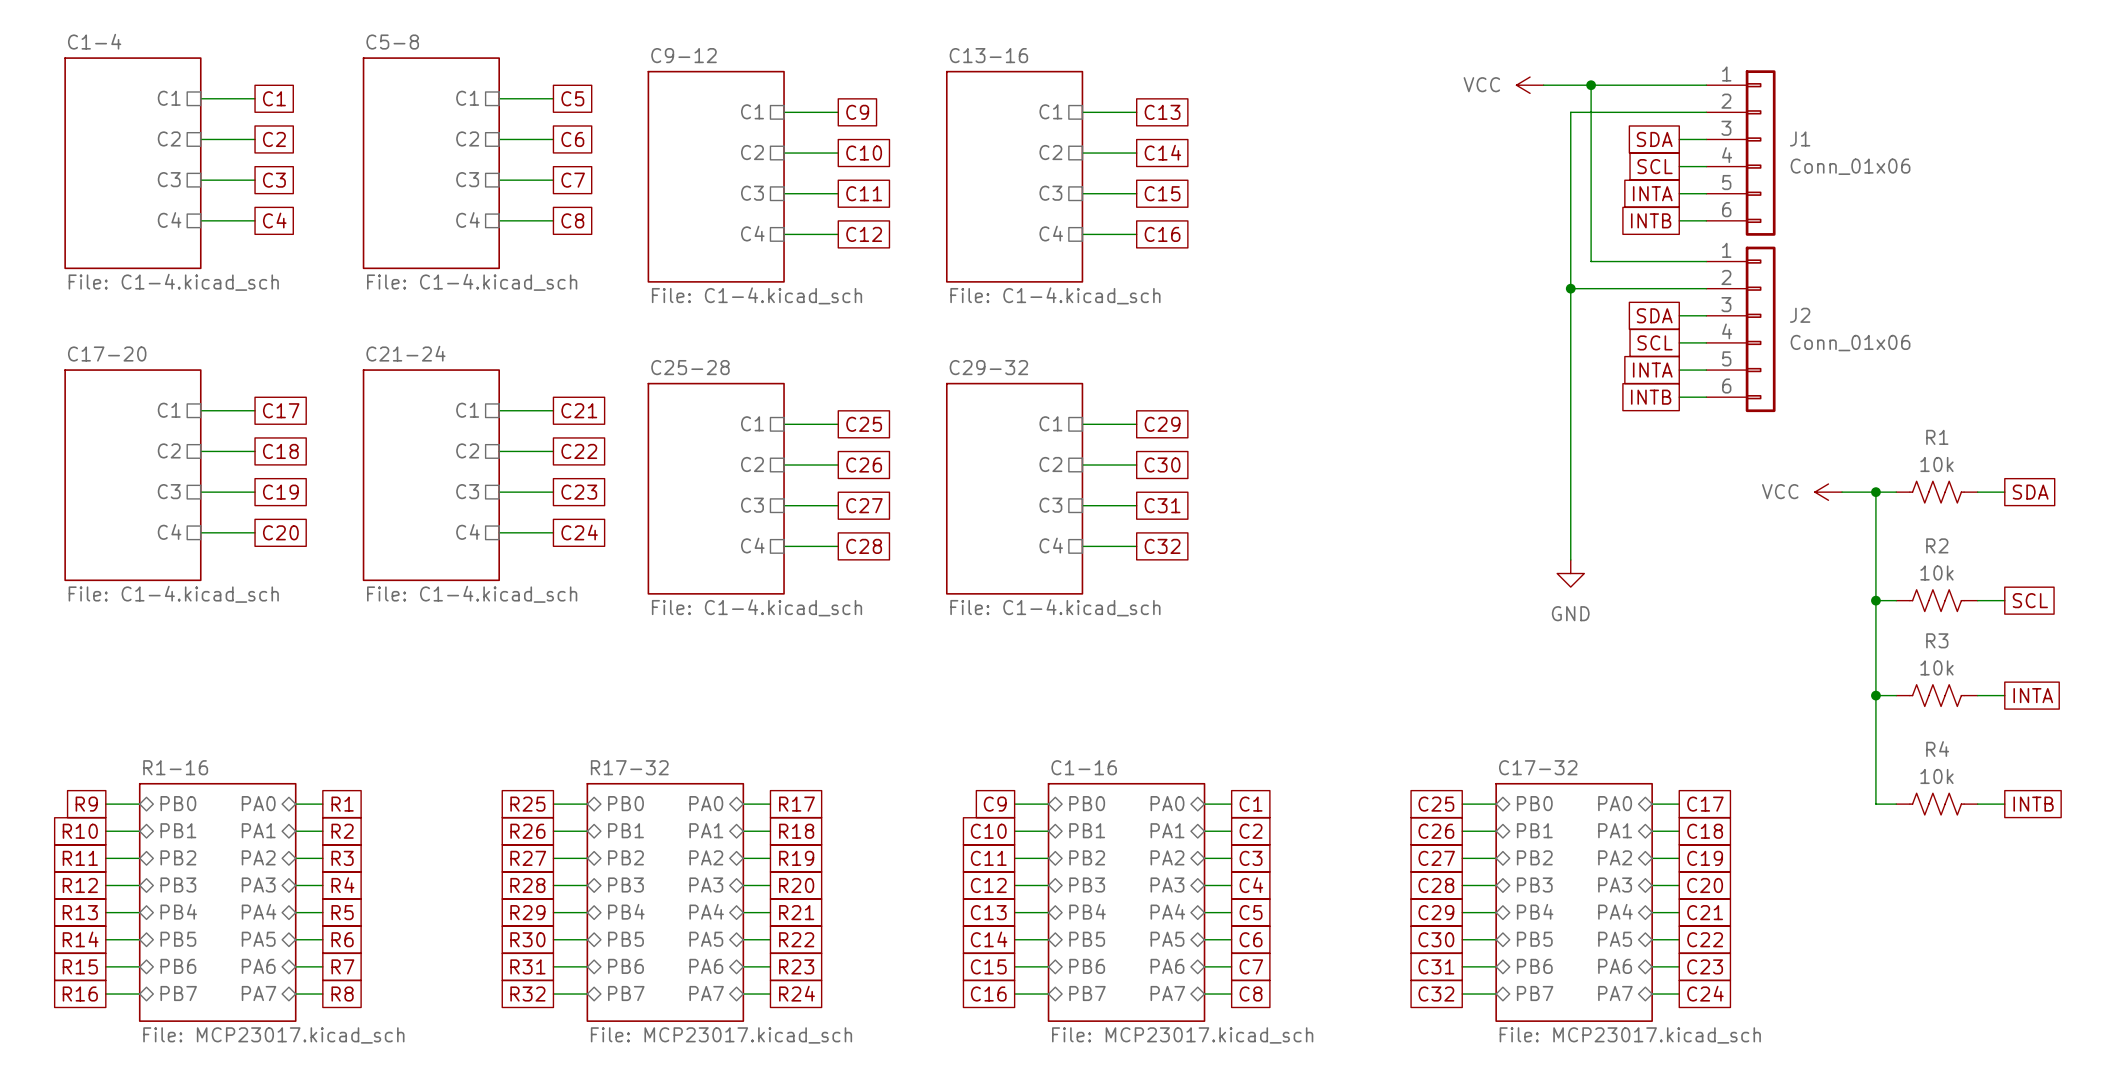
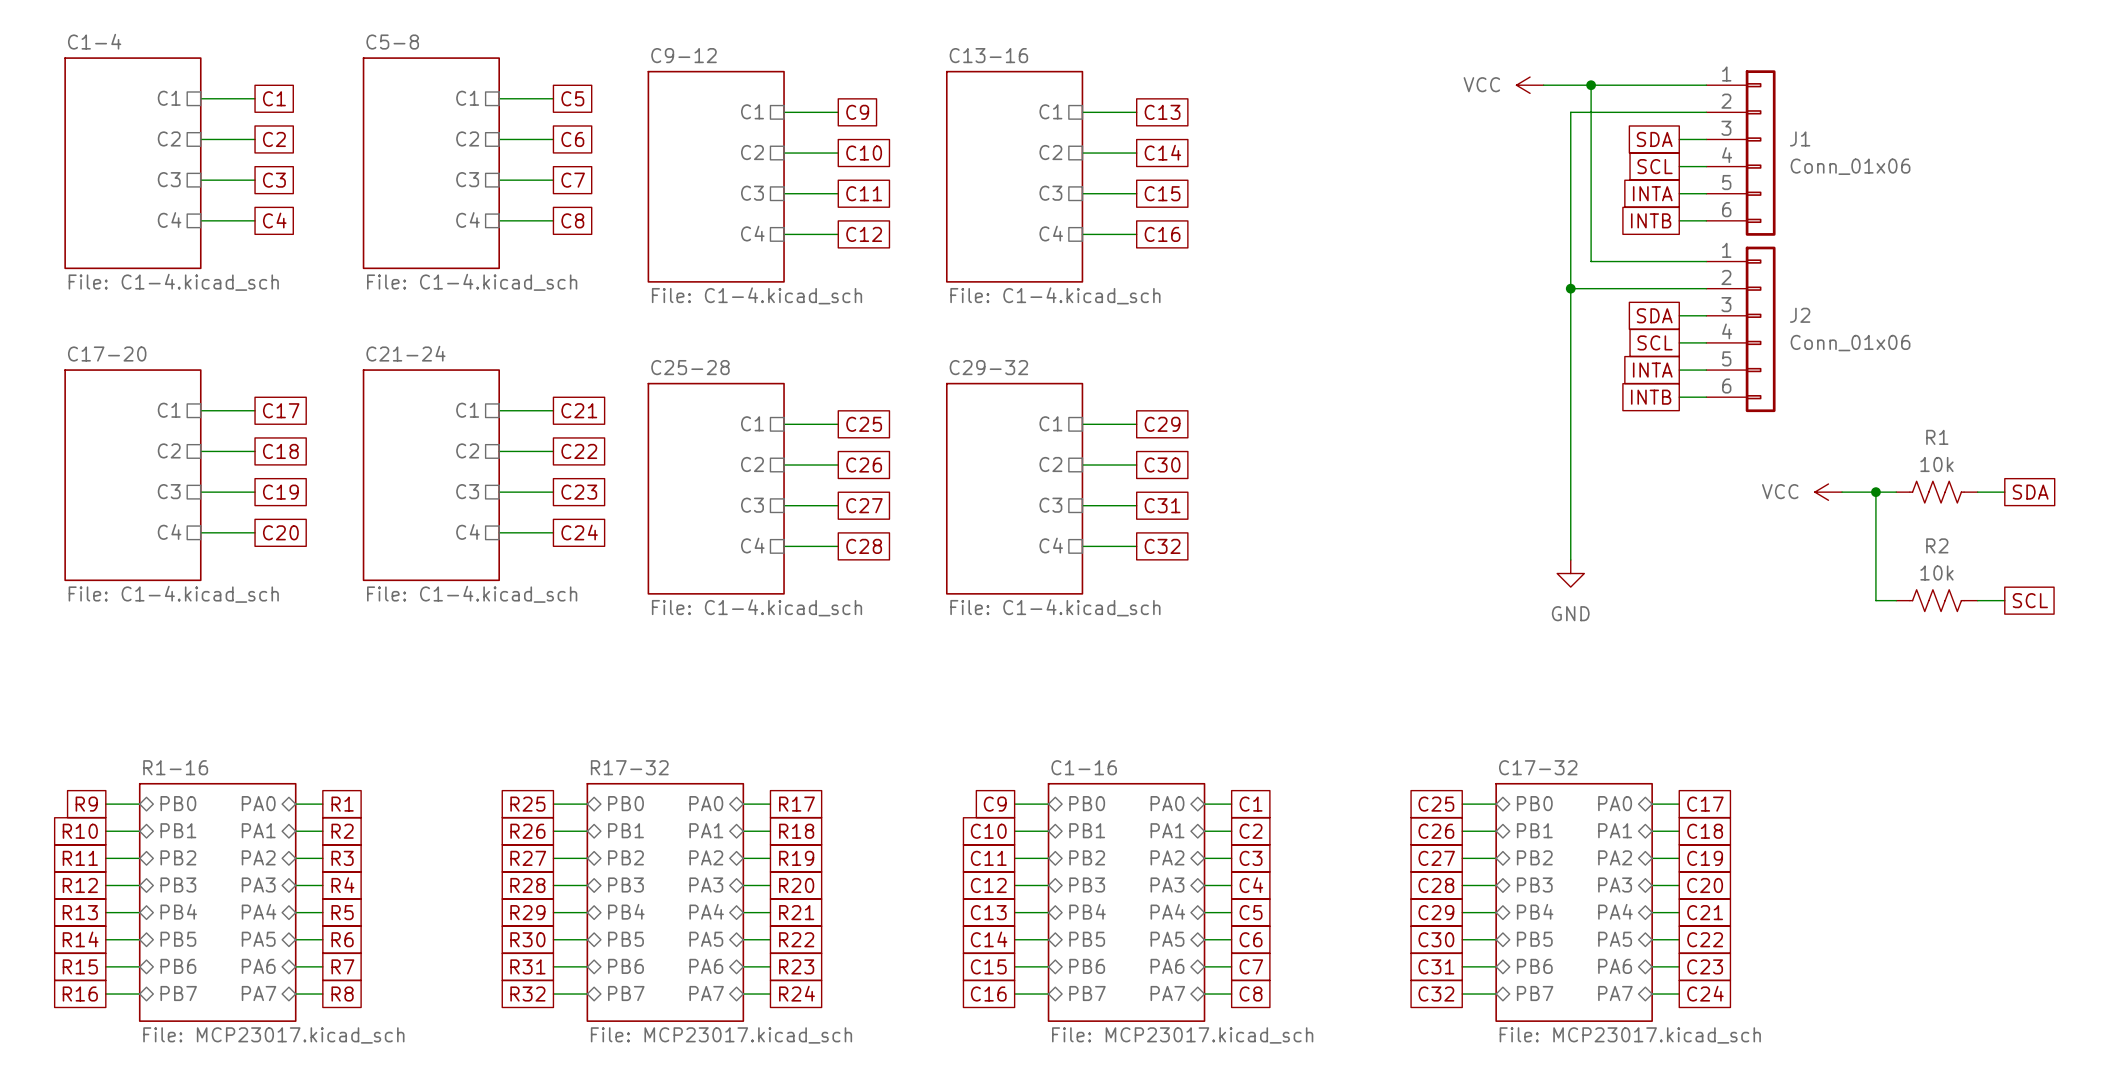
wire: (1875, 600) (1875, 804) (1896, 804) -> none
junction: (1875, 600) -> none
wire: (1875, 695) (1896, 695) -> none
junction: (1875, 695) -> none
R3: 10k (1936, 695) -> none
wire: (1977, 695) (2004, 695) -> none
global label: INTA (2033, 695) -> none
R4: 10k (1936, 804) -> none
wire: (1977, 804) (2004, 804) -> none
global label: INTB (2033, 804) -> none

